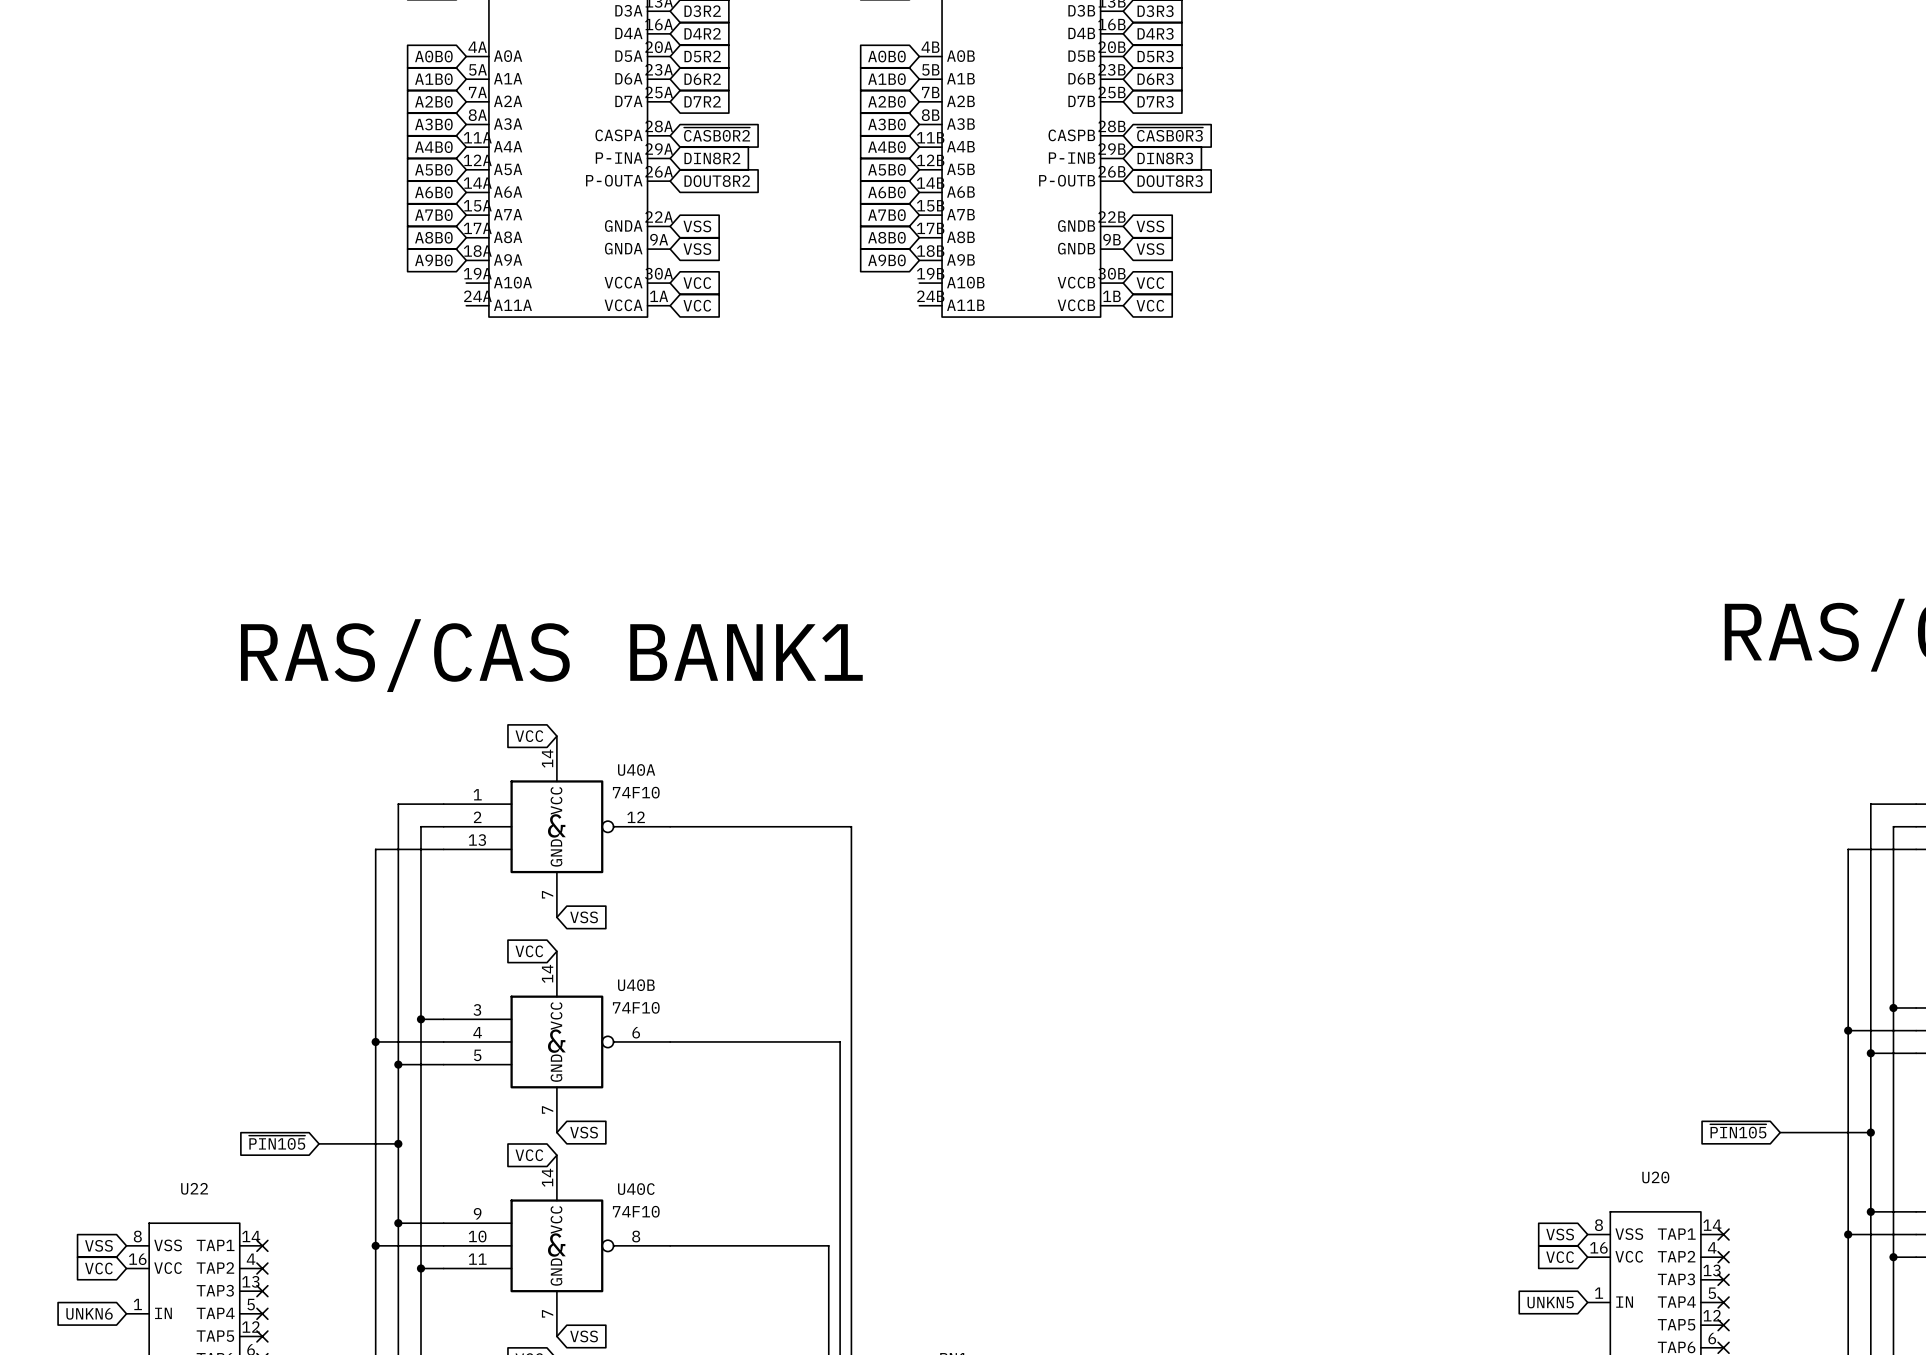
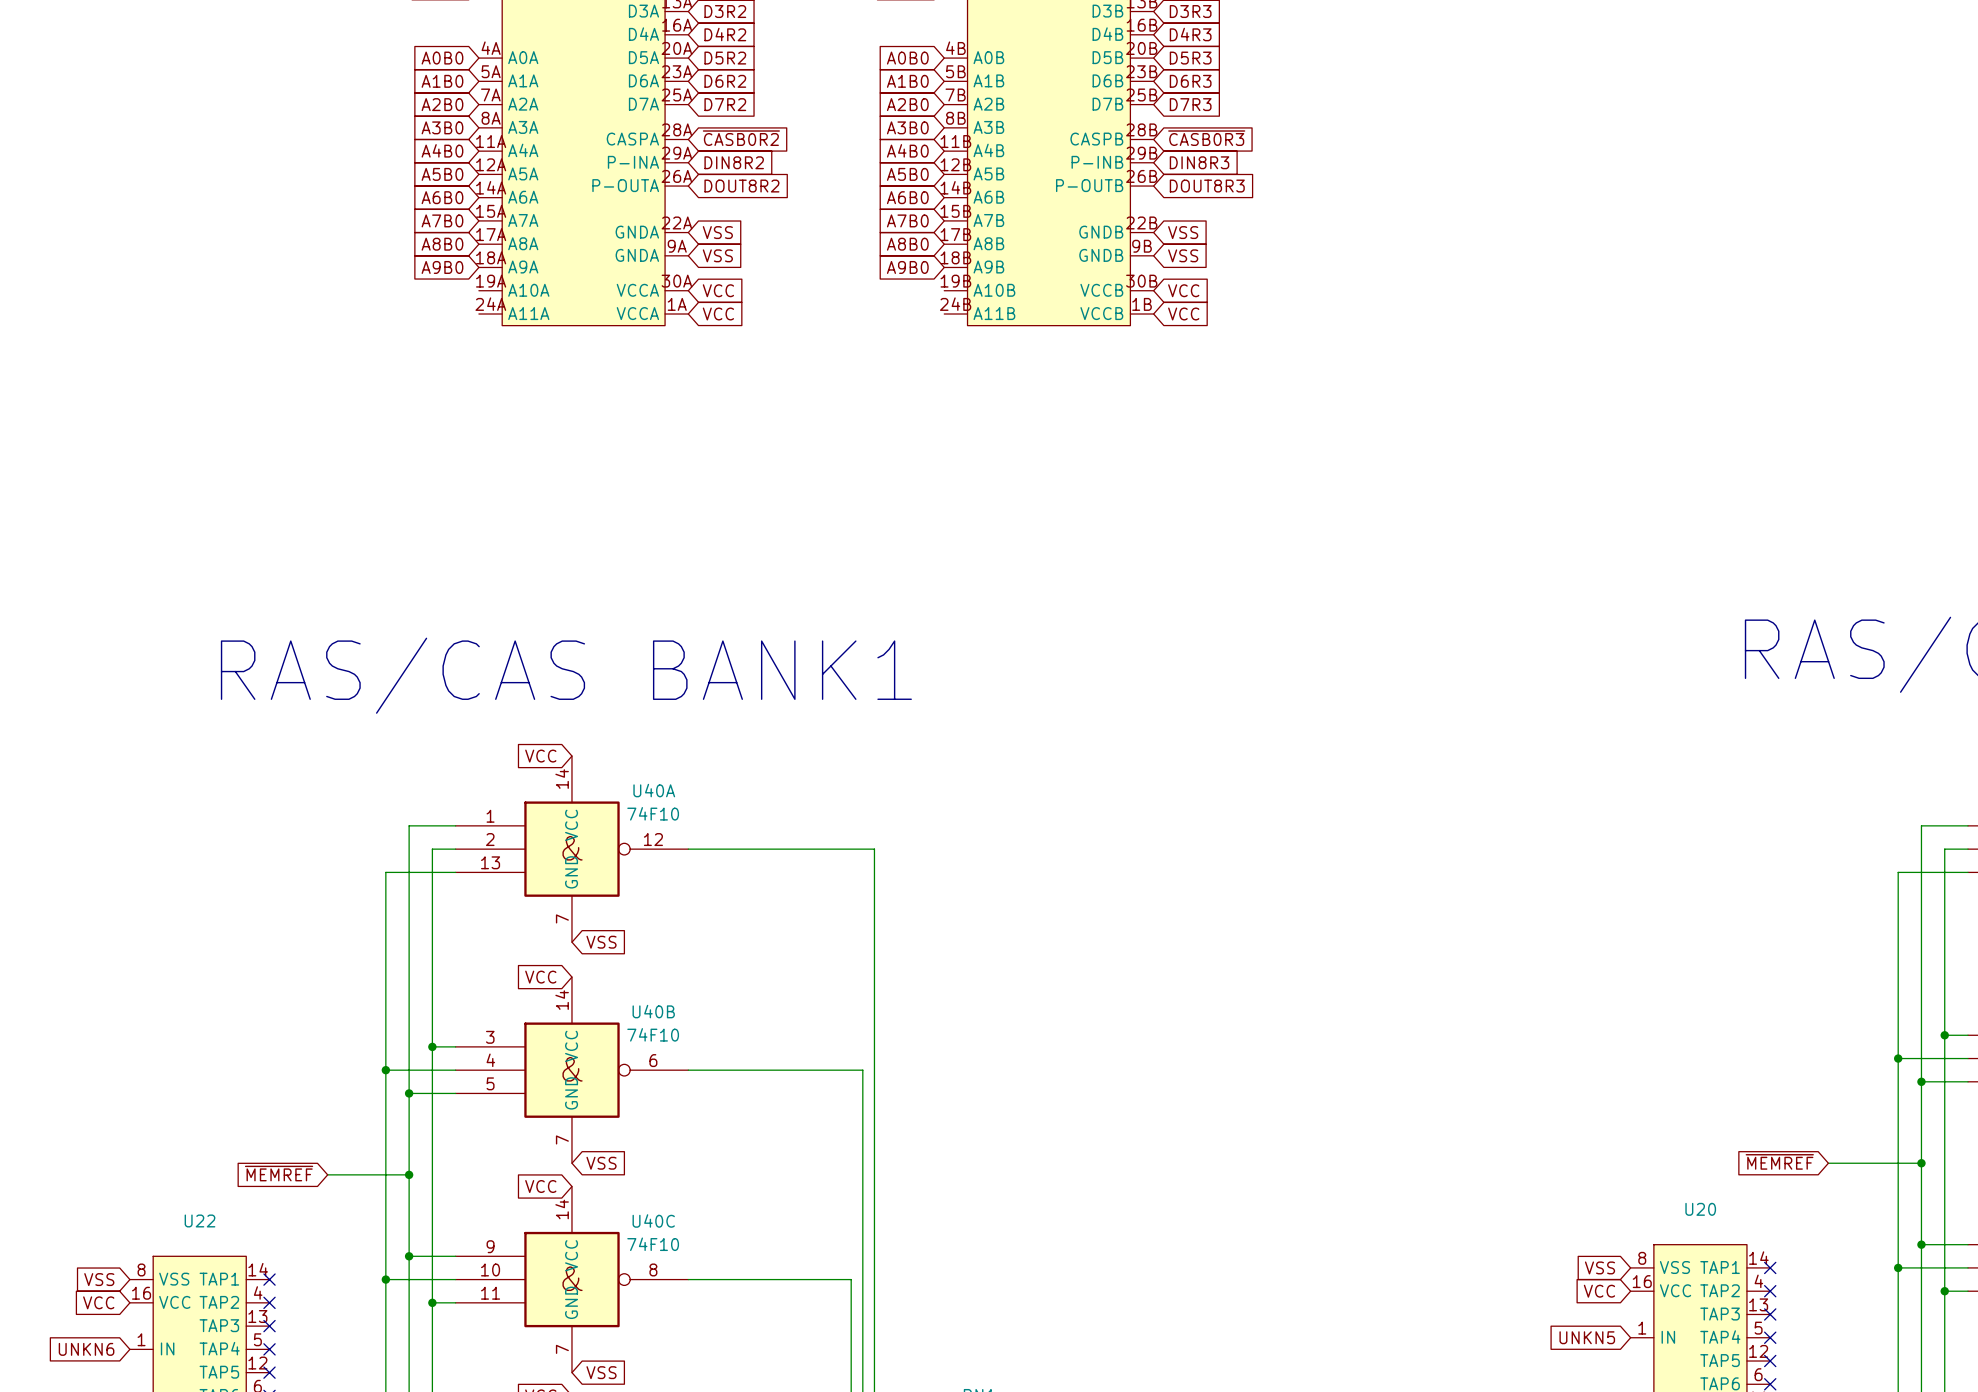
global label: ~{PIN105} (1738, 1131) -> ~{MEMREF} (1779, 1161)
global label: ~{PIN105} (277, 1142) -> ~{MEMREF} (279, 1173)

